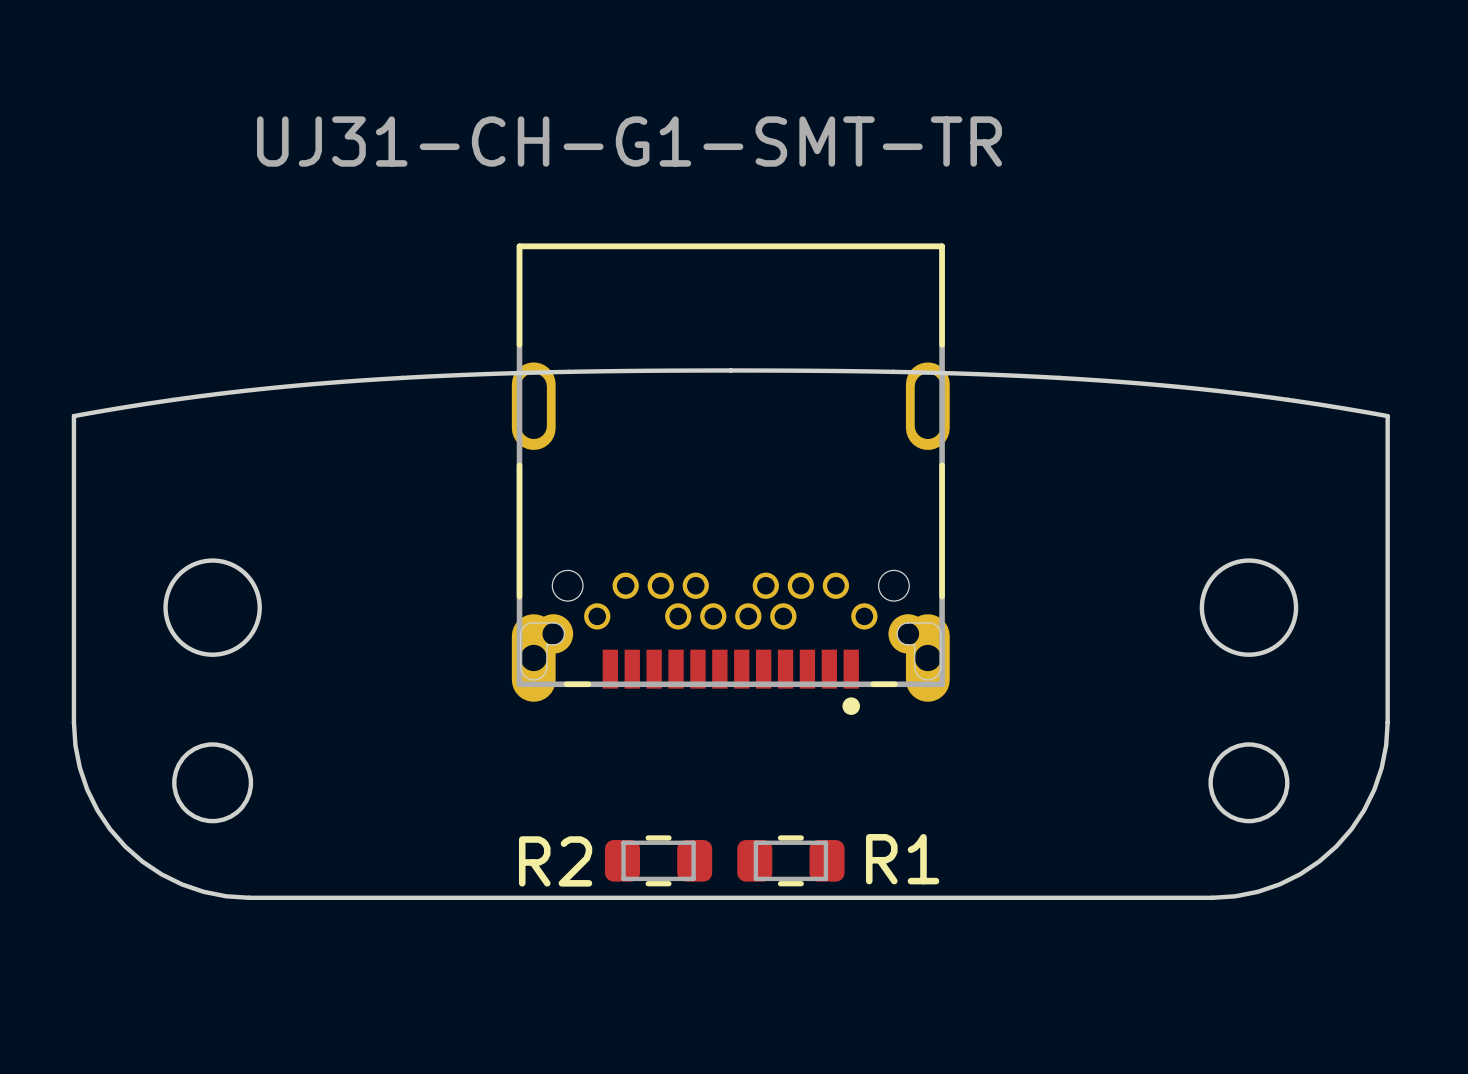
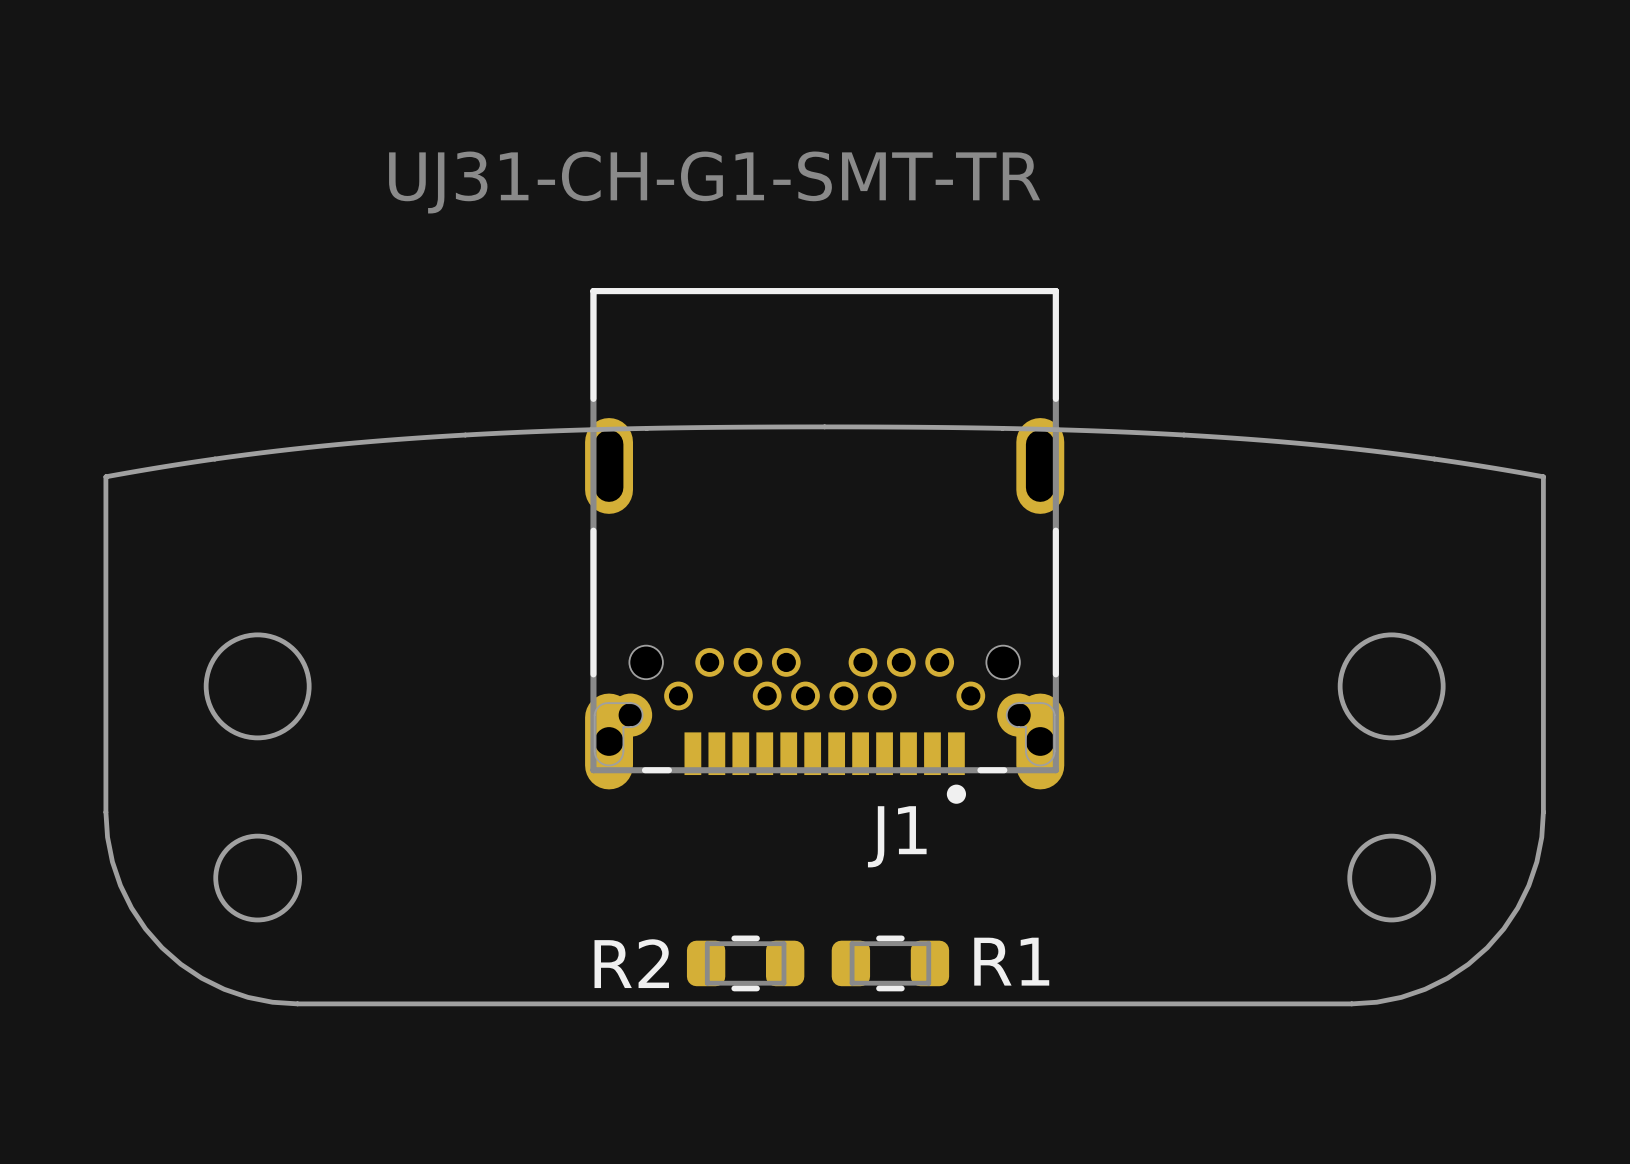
J1 name: none -> J1 (897, 836)

